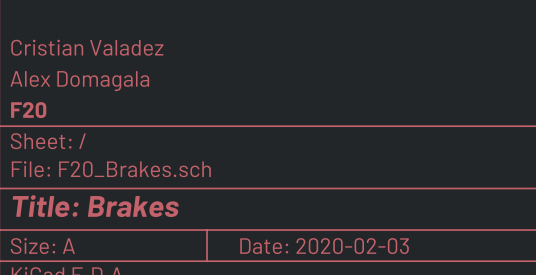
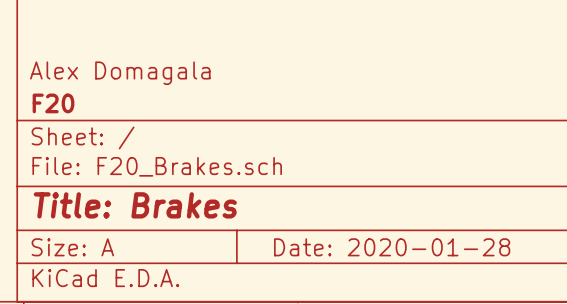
title block: Cristian Valadez (87, 47) -> none
title block: Date: 2020-02-03 (324, 246) -> Date: 2020-01-28 (392, 247)

